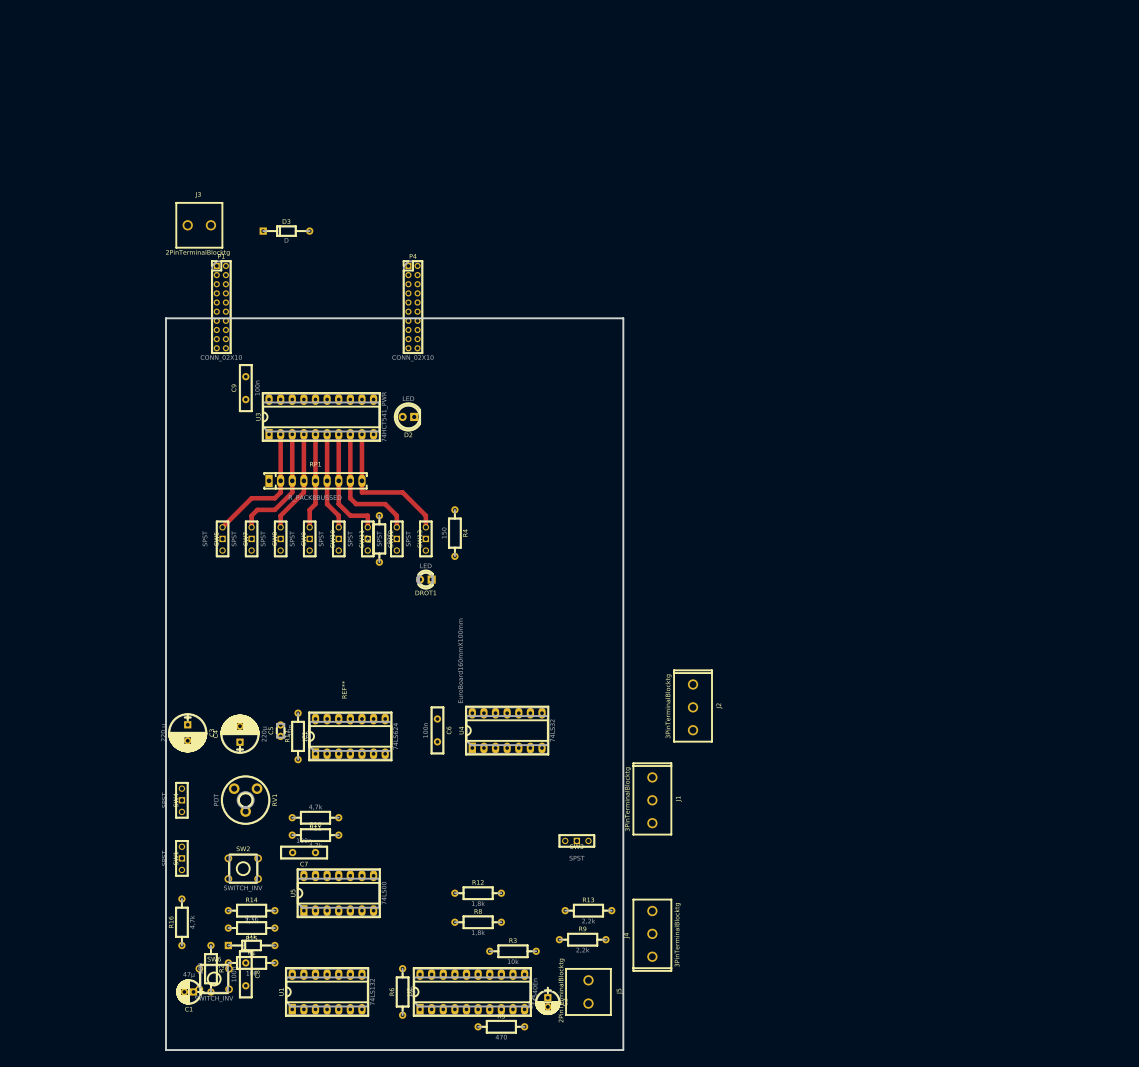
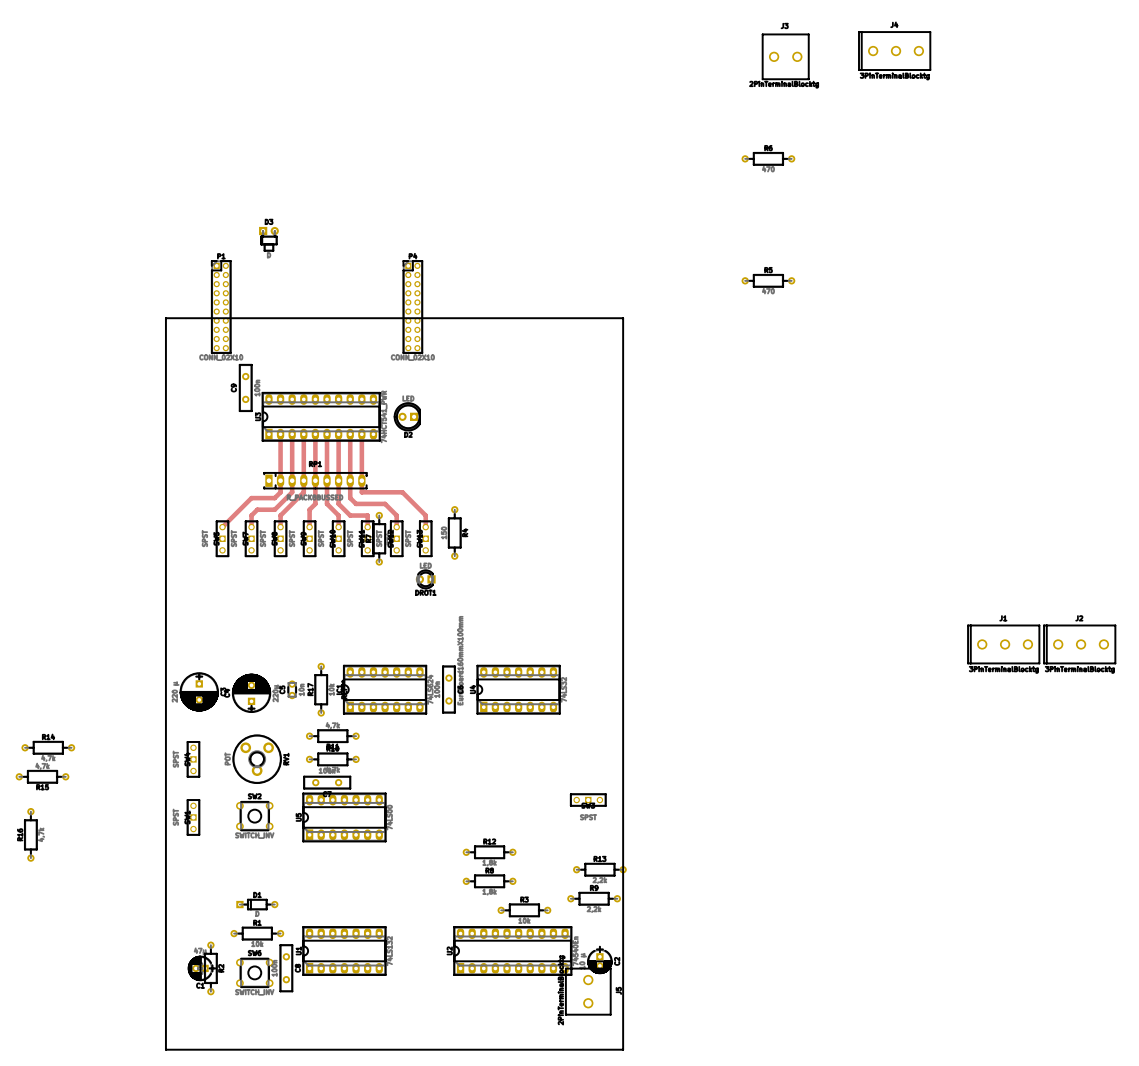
part position: (199, 225) -> (785, 56)
part footprint: [259, 225, 314, 237] -> [259, 226, 279, 252]
part rotation: 0° (693, 705) -> 90° counterclockwise (1079, 644)
part position: (693, 705) -> (1079, 644)
part position: (280, 730) -> (292, 689)
part position: (437, 730) -> (448, 689)
part position: (507, 730) -> (518, 689)
part position: (187, 732) -> (199, 691)
part position: (239, 734) -> (251, 693)
part position: (298, 736) -> (321, 689)
part position: (350, 736) -> (385, 689)
part rotation: 0° (652, 798) -> 90° counterclockwise (1003, 644)
part position: (652, 798) -> (1003, 644)
part position: (181, 800) -> (193, 759)
part position: (245, 800) -> (257, 759)
part position: (315, 817) -> (332, 736)
part position: (315, 835) -> (332, 759)
part position: (576, 840) -> (588, 800)
part position: (304, 852) -> (327, 782)
part position: (181, 858) -> (193, 817)
part position: (243, 868) -> (254, 816)
part position: (338, 893) -> (344, 817)
part position: (478, 893) -> (489, 852)
part position: (251, 910) -> (48, 747)
part position: (588, 910) -> (599, 869)
part position: (181, 922) -> (30, 834)
part position: (478, 922) -> (489, 881)
part position: (251, 928) -> (42, 776)
part rotation: 0° (652, 935) -> 90° clockwise (894, 51)
part position: (652, 935) -> (894, 51)
part position: (582, 939) -> (594, 898)
part footprint: [224, 940, 279, 951] -> [236, 899, 279, 910]
part position: (512, 951) -> (524, 910)
part position: (251, 962) -> (257, 933)
part position: (245, 974) -> (286, 968)
part position: (214, 979) -> (254, 972)
part position: (190, 991) -> (201, 968)
part position: (327, 991) -> (344, 951)
part rotation: 0° (402, 991) -> 90° clockwise (768, 158)
part position: (402, 991) -> (768, 158)
part position: (472, 991) -> (512, 951)
part position: (547, 1000) -> (599, 959)
part position: (501, 1026) -> (768, 280)

